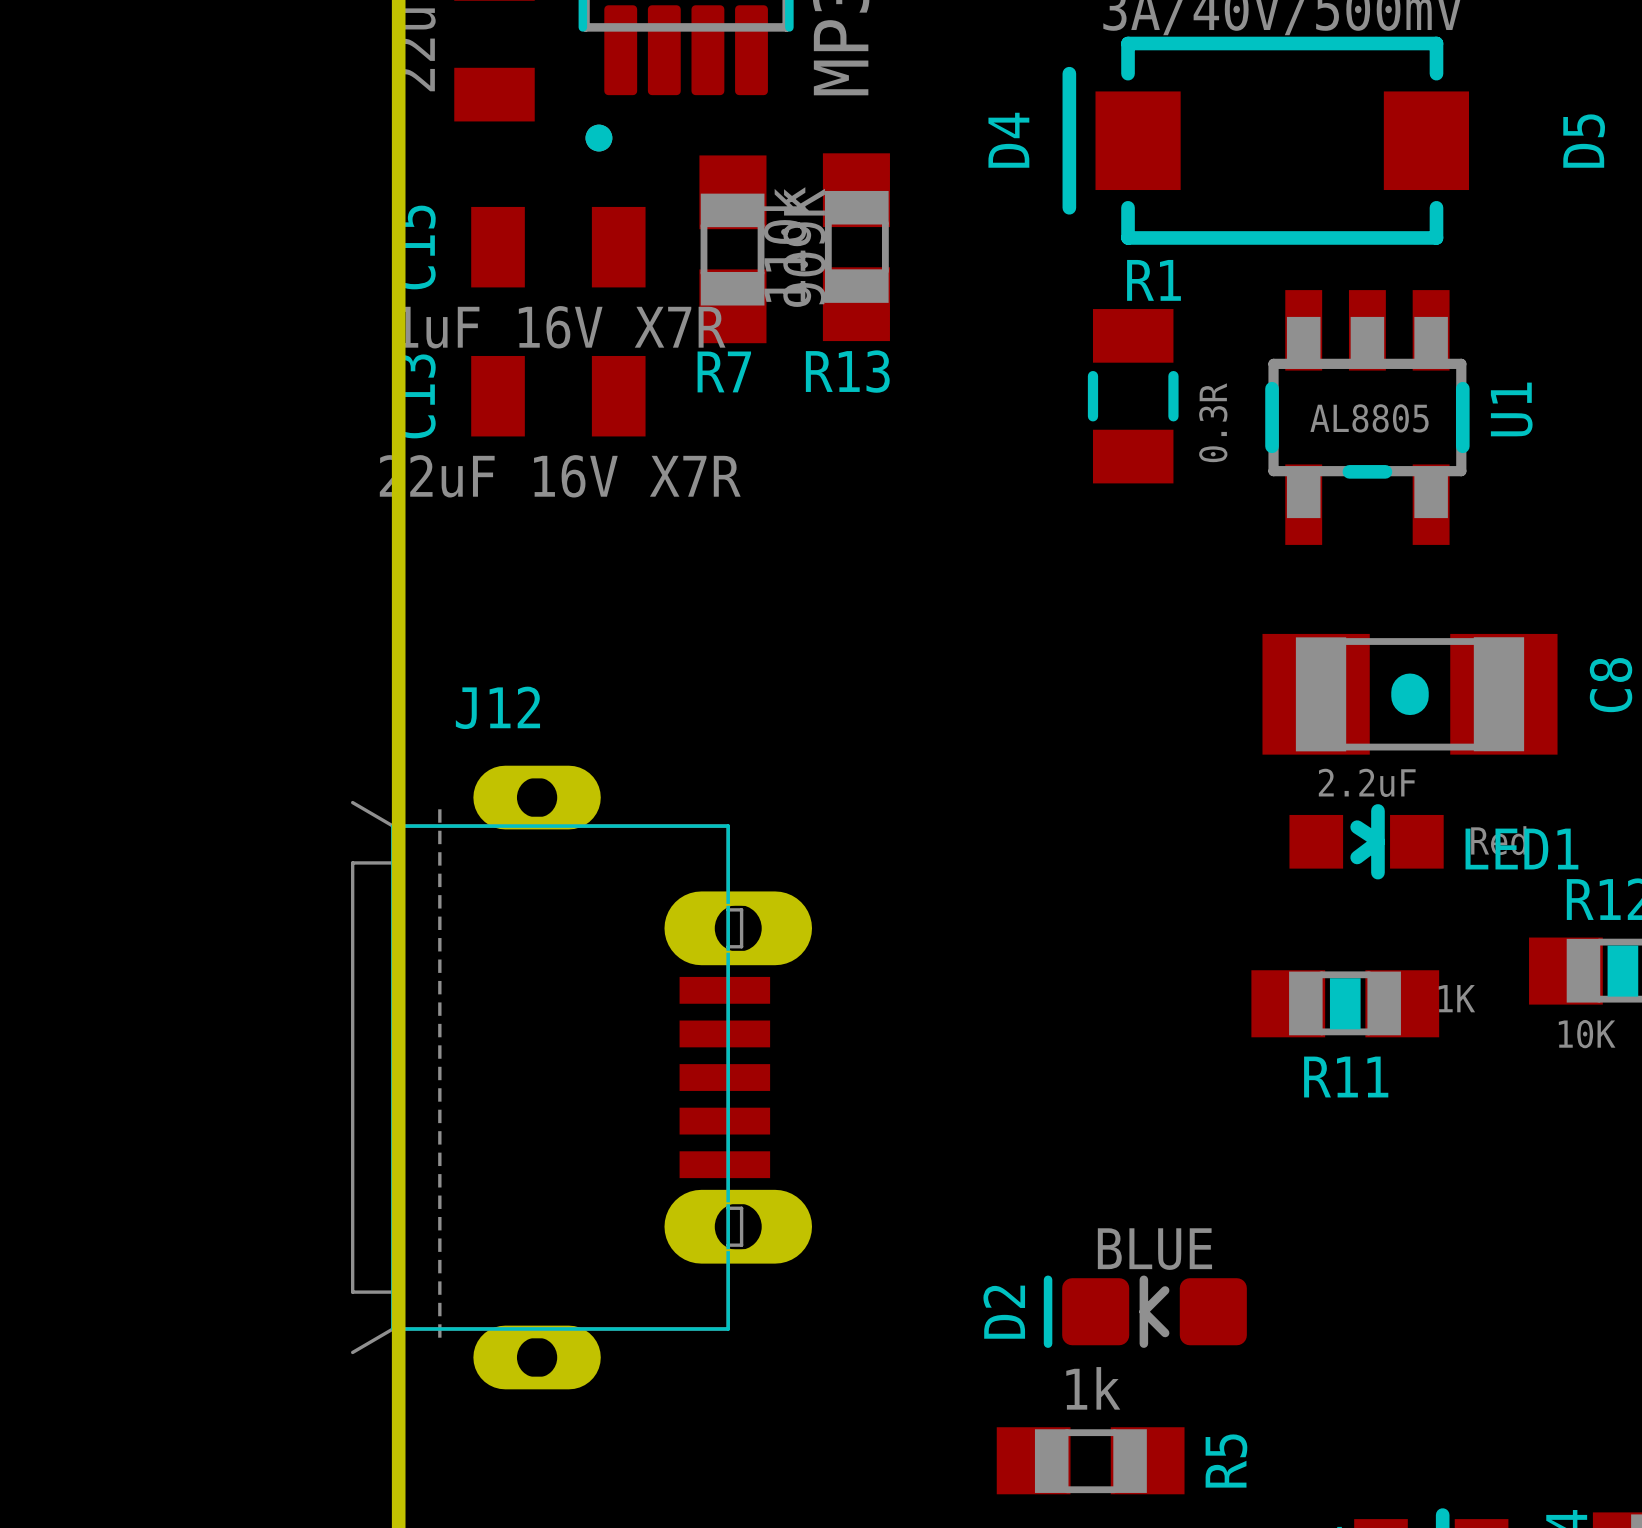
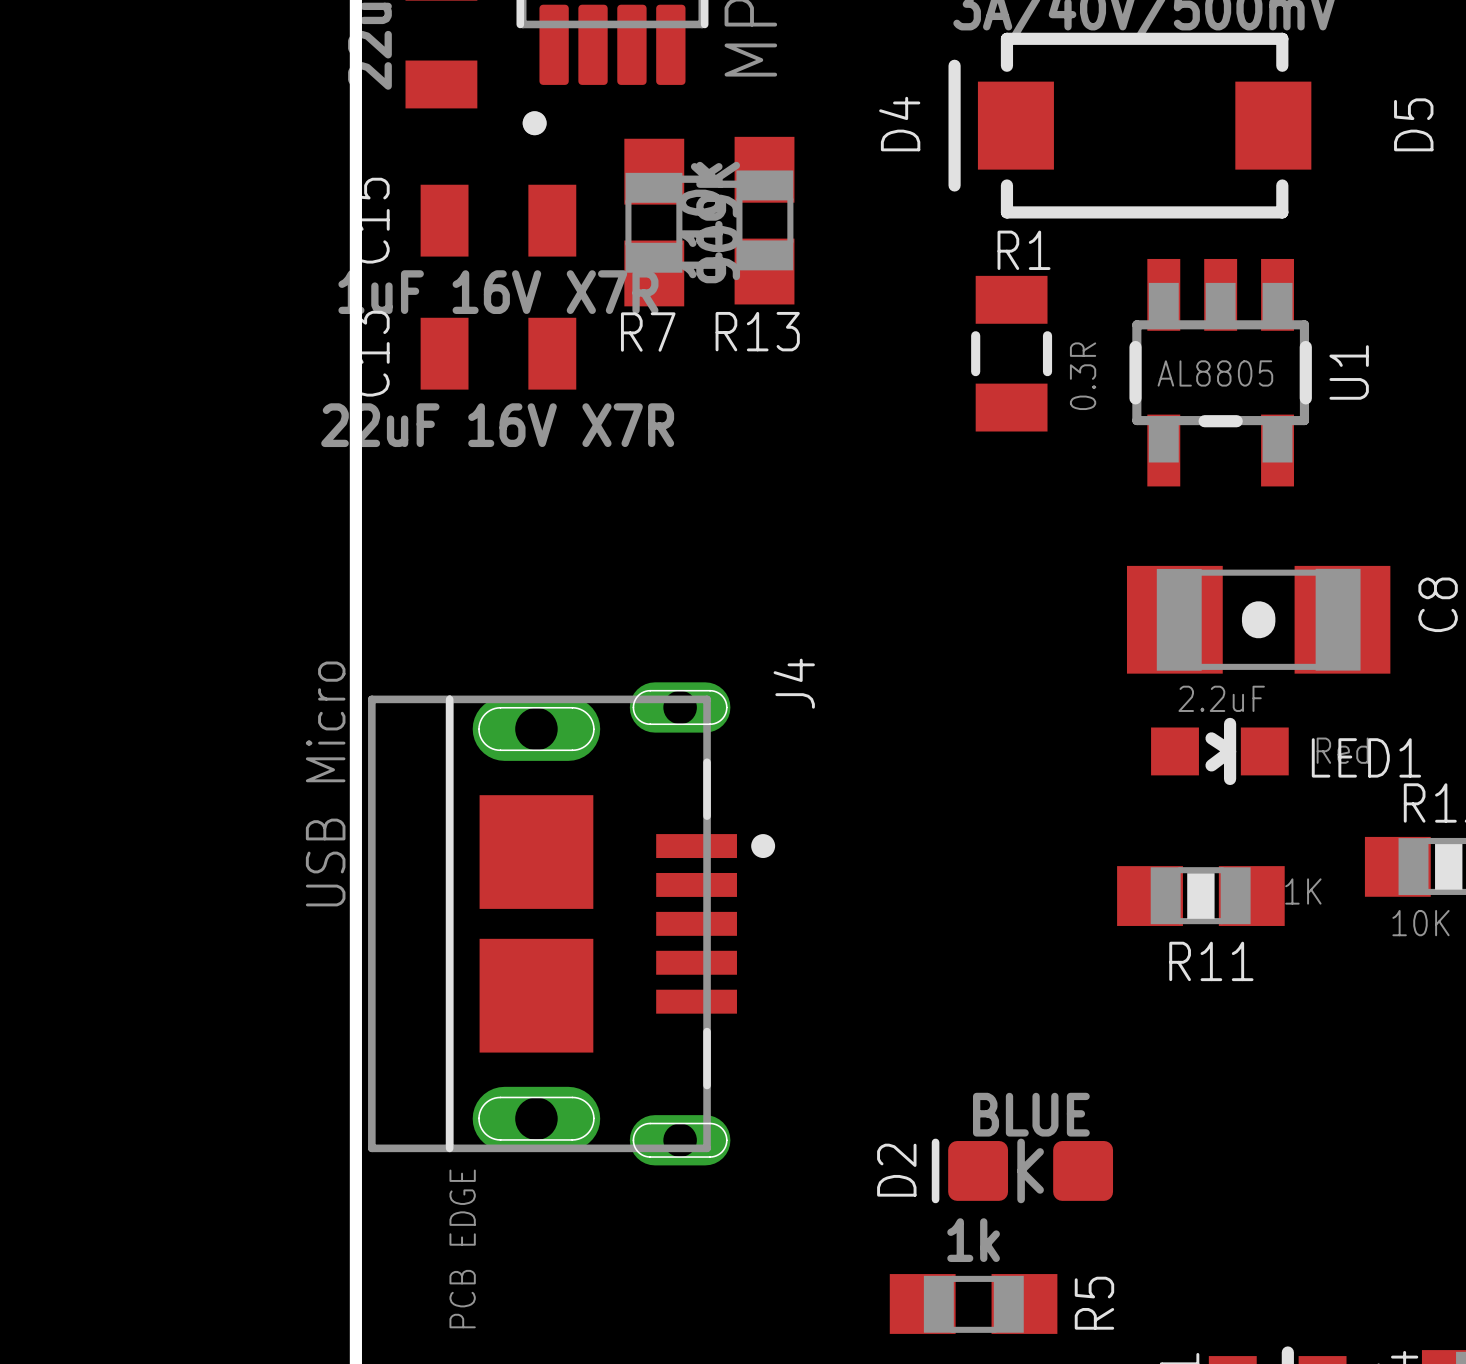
J4: none -> USB Micro (571, 923)
J12: (581, 1077) -> none

